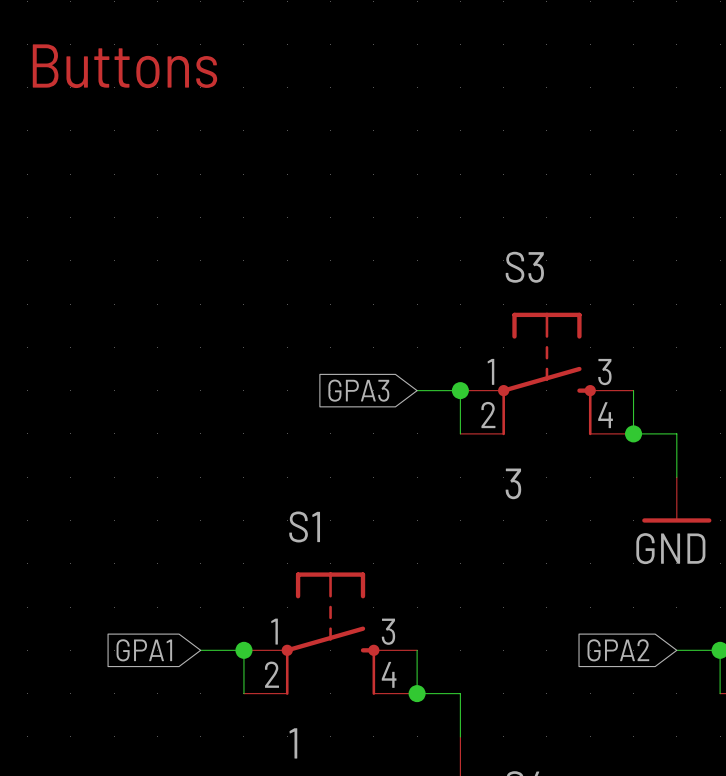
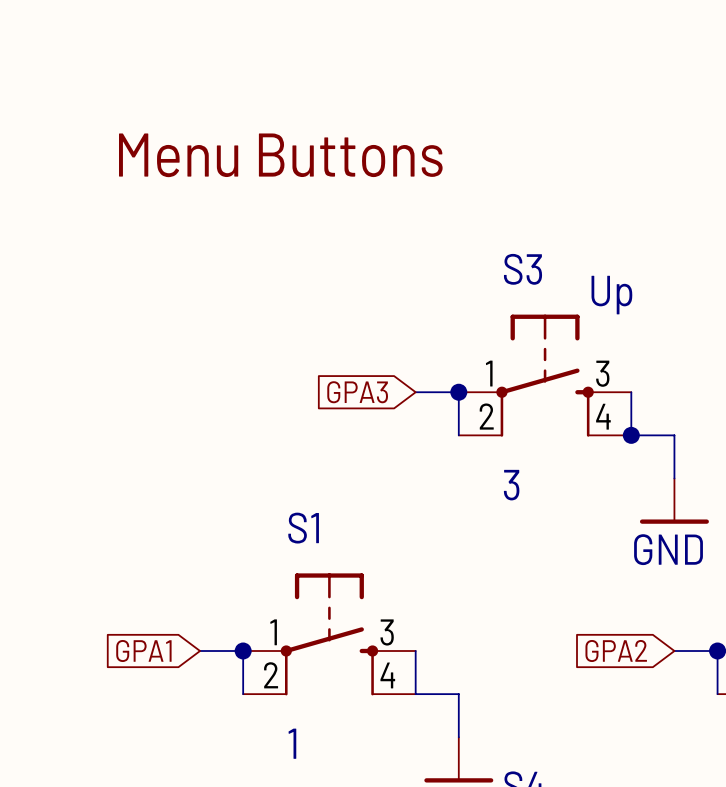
text: Buttons (124, 66) -> Menu Buttons (280, 155)
text: none -> Up (611, 295)
junction: (417, 693) -> none

